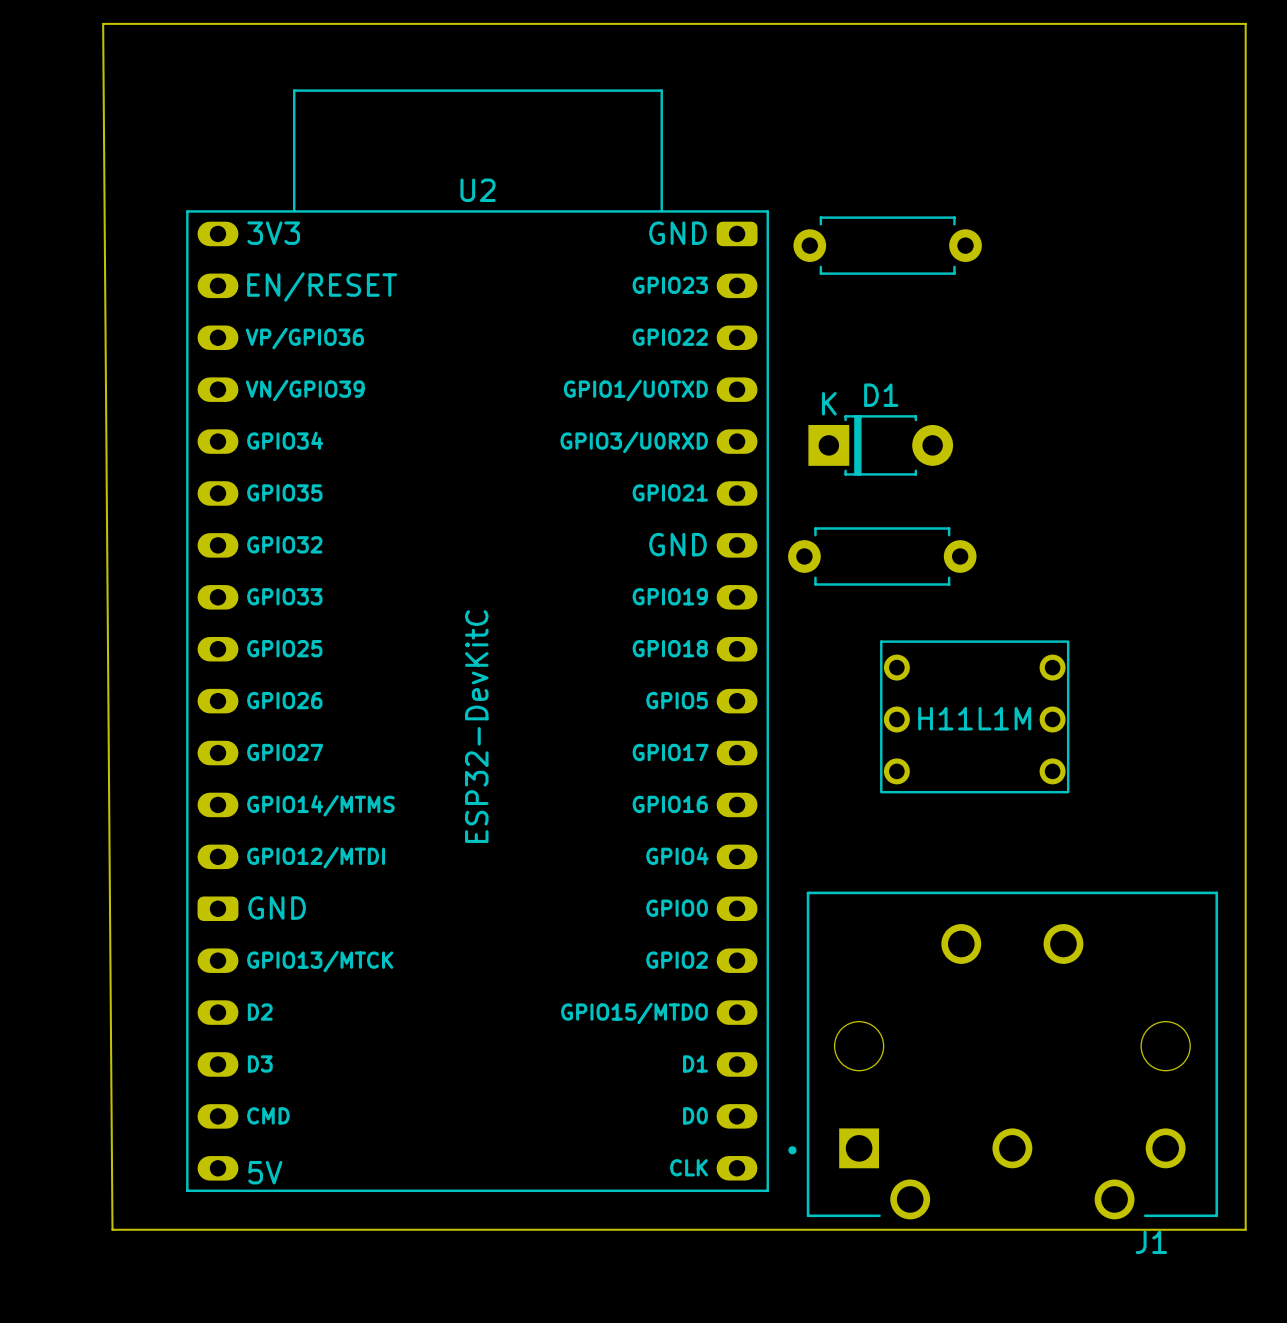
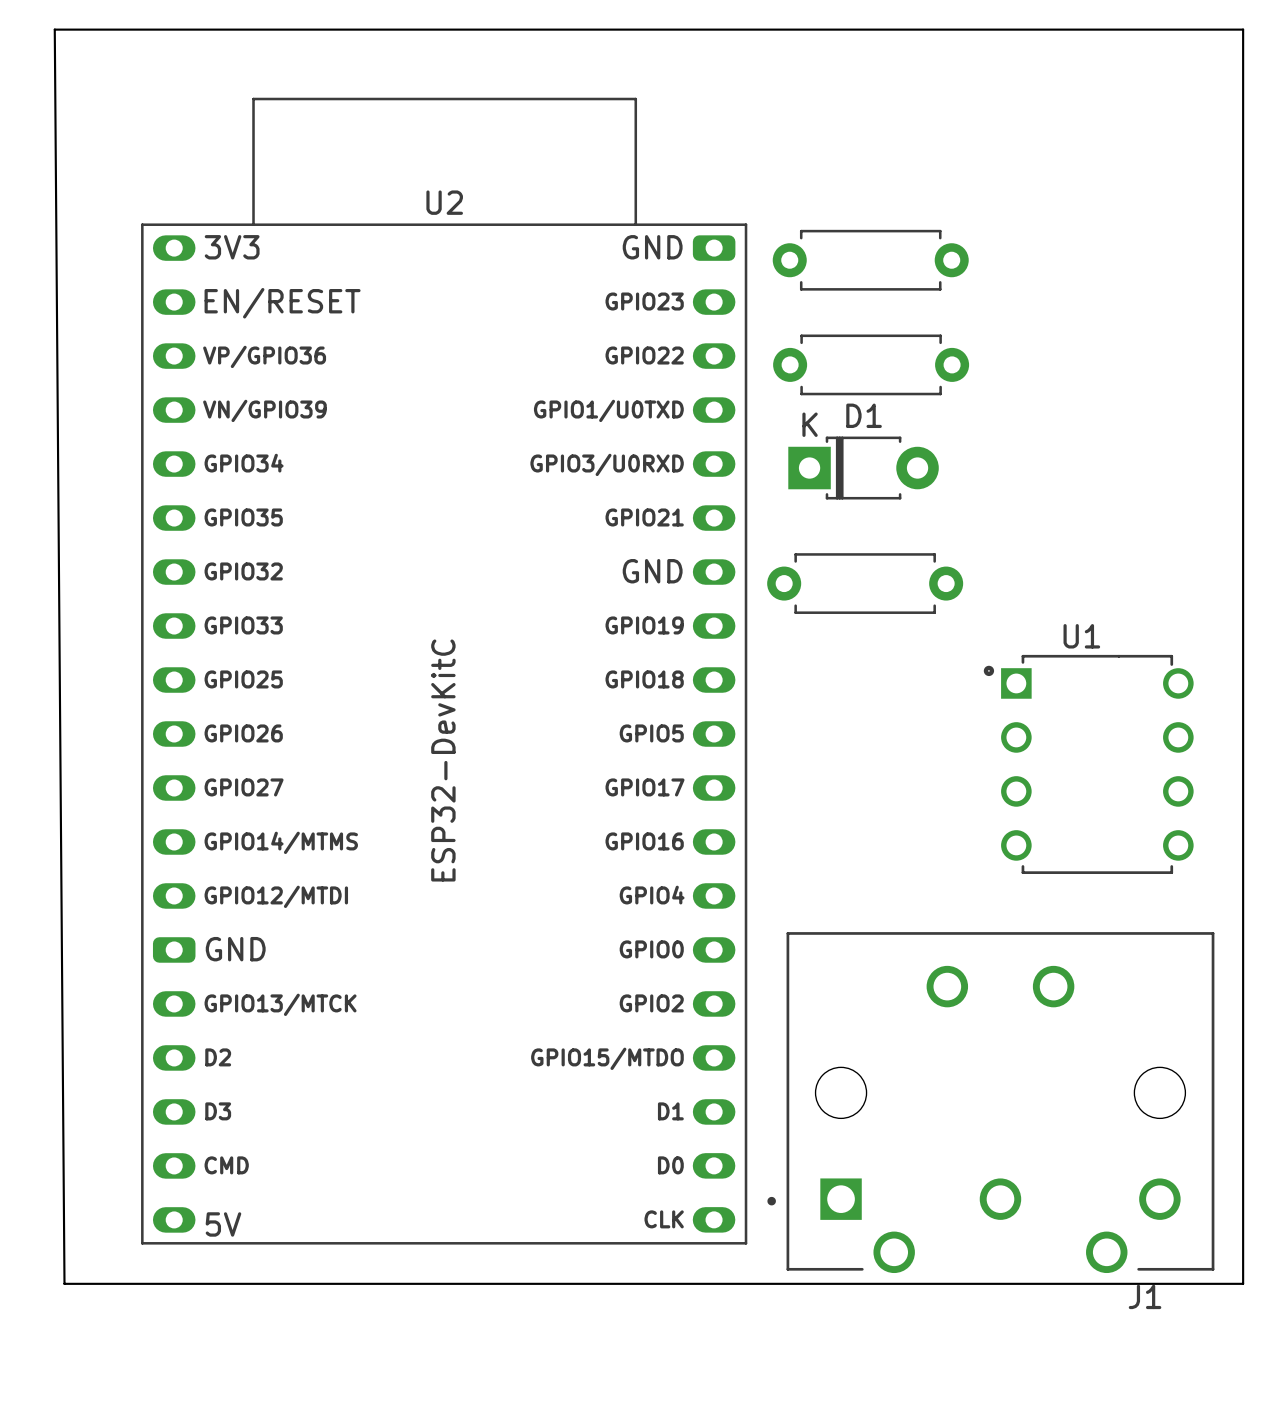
part: none -> (871, 364)
part: H11L1M (974, 716) -> none
U1: none -> (1088, 764)

